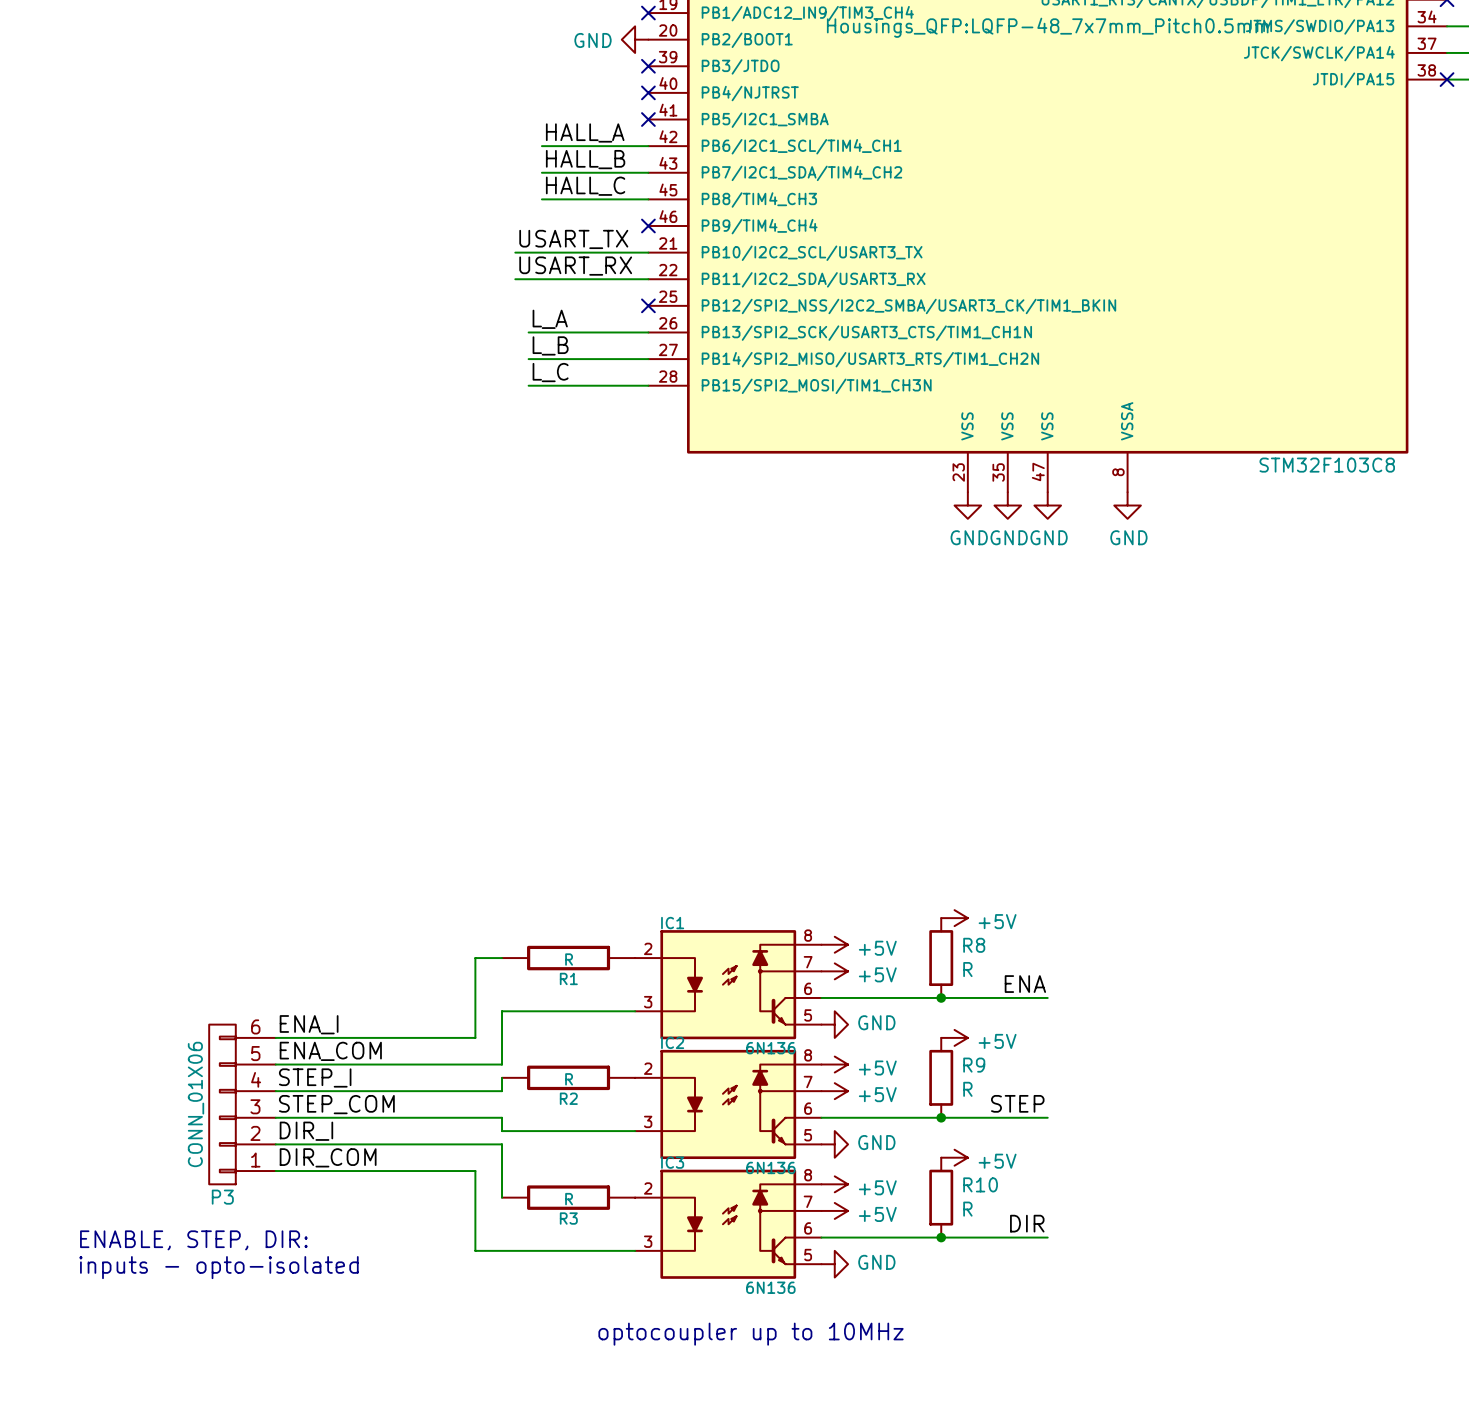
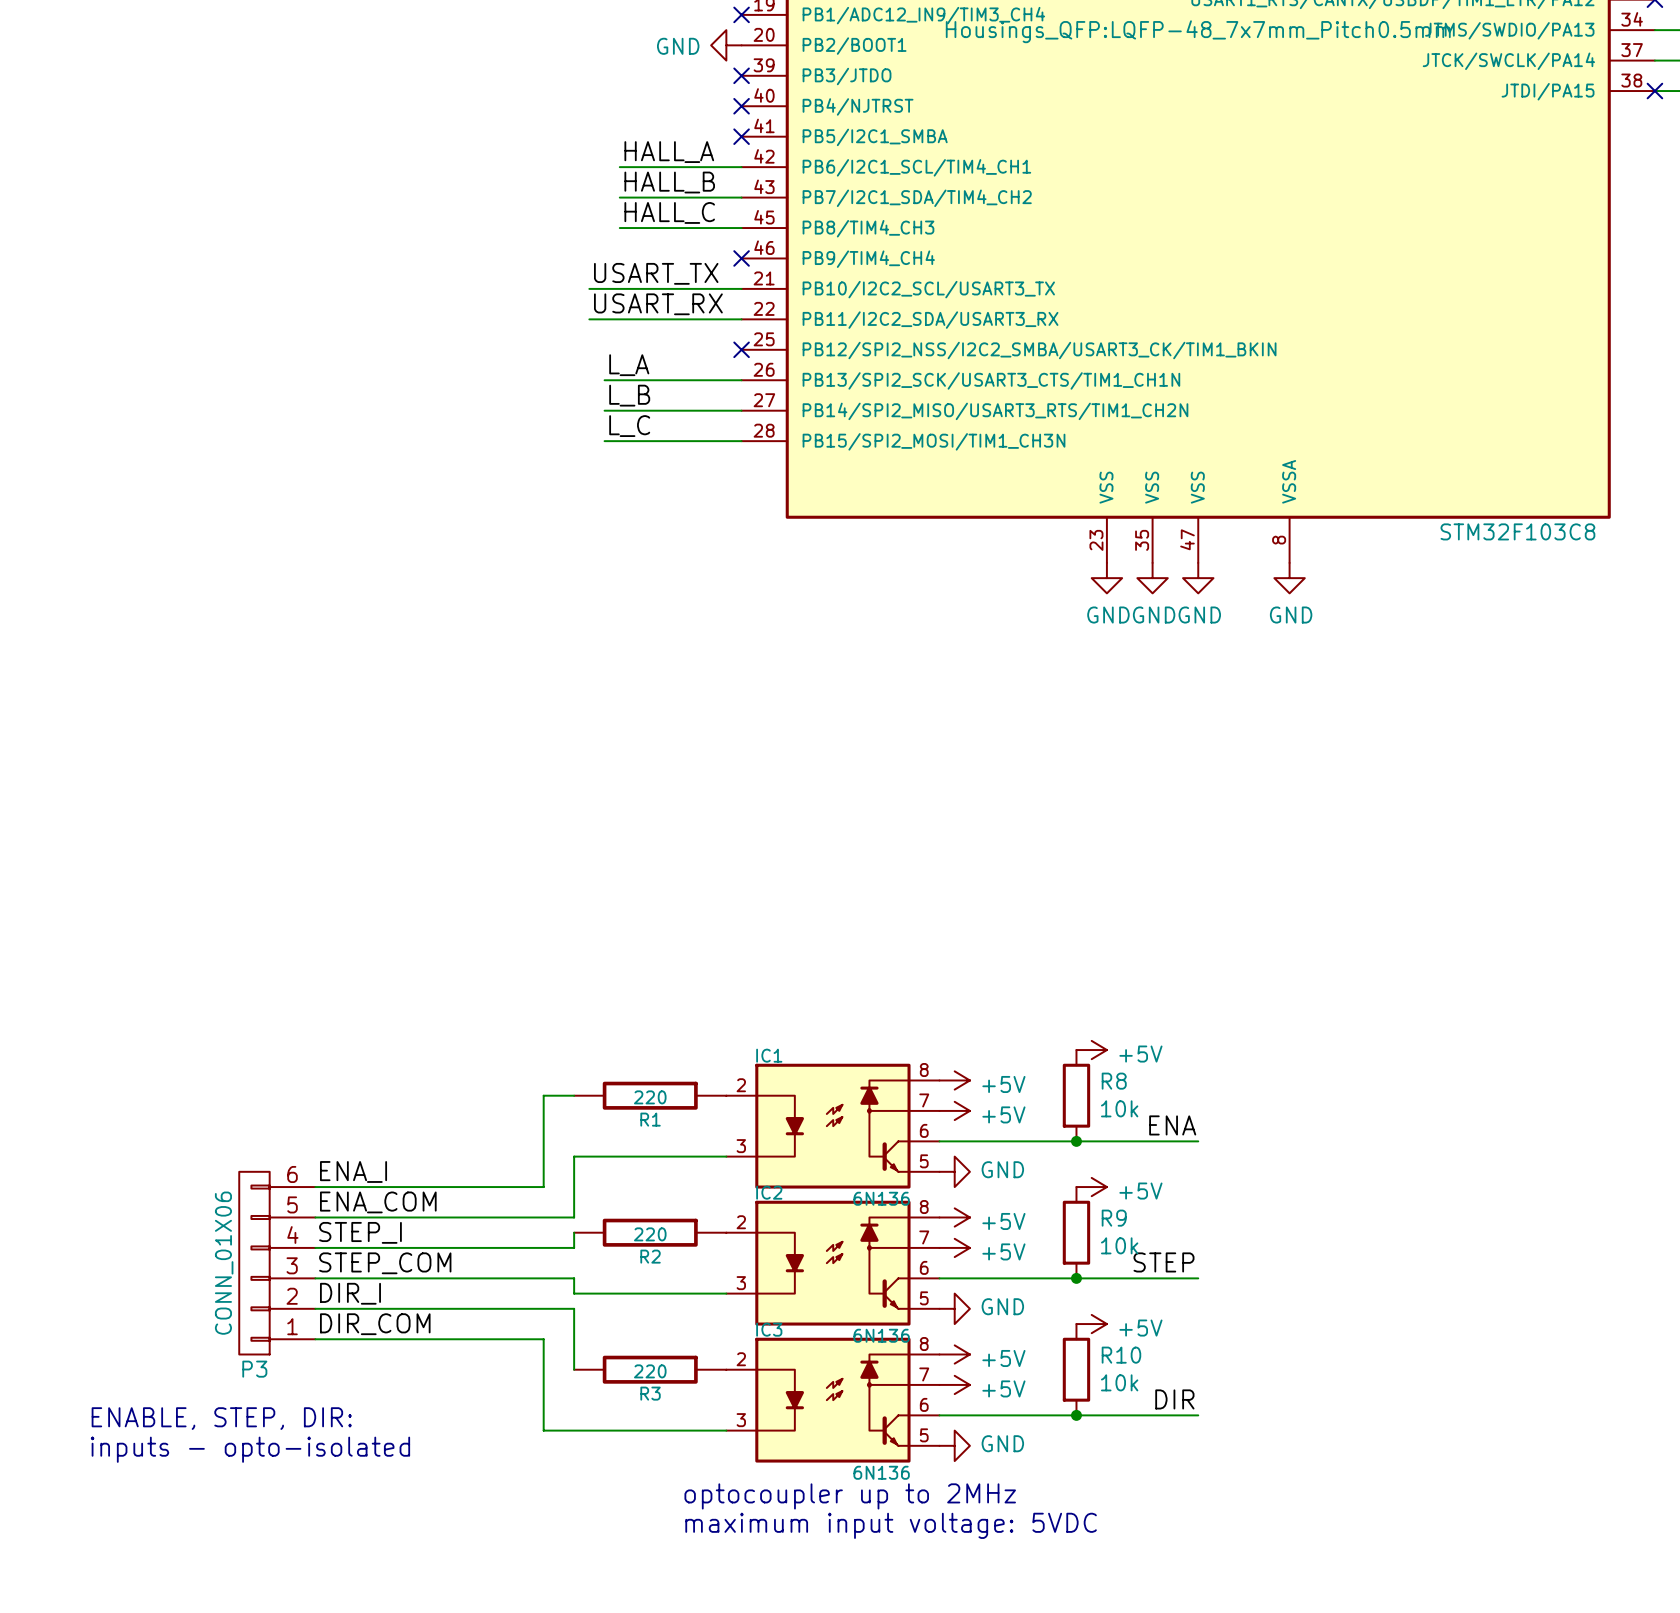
R1 value: R (569, 959) -> 220 (650, 1097)
R8 value: R (967, 969) -> 10k (1119, 1108)
R2 value: R (569, 1079) -> 220 (650, 1234)
R9 value: R (967, 1089) -> 10k (1119, 1245)
R3 value: R (569, 1199) -> 220 (650, 1371)
R10 value: R (967, 1209) -> 10k (1119, 1382)
text: none -> optocoupler up to 2MHz (850, 1496)
text: optocoupler up to 10MHz (751, 1334) -> maximum input voltage: 5VDC (891, 1525)

